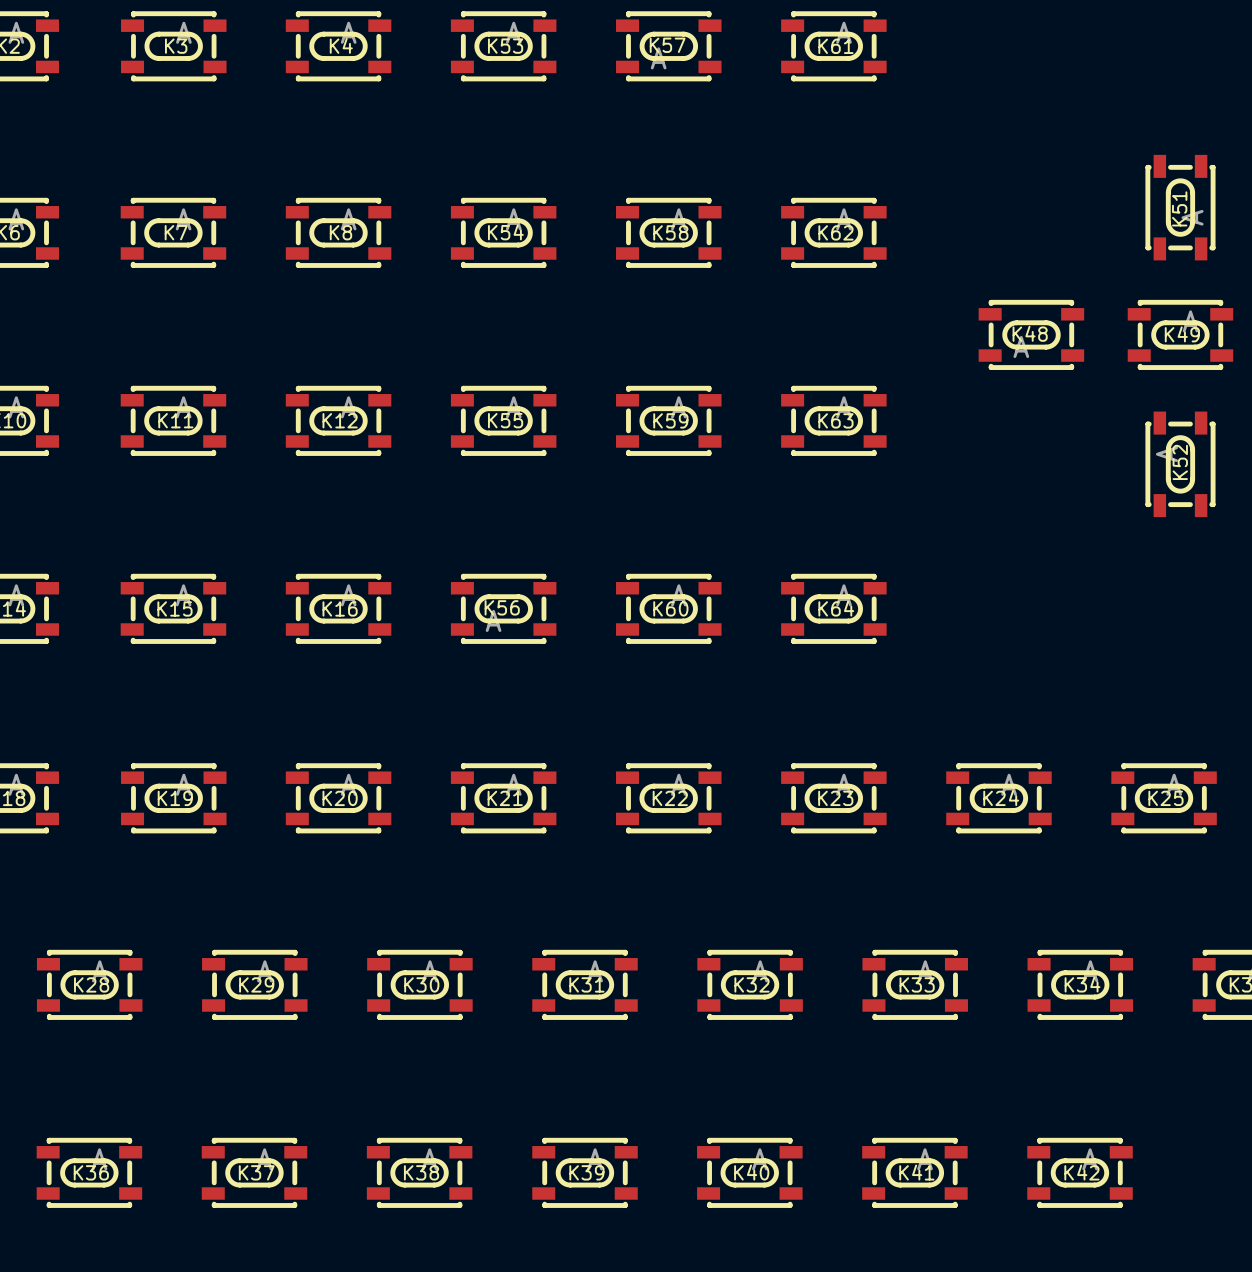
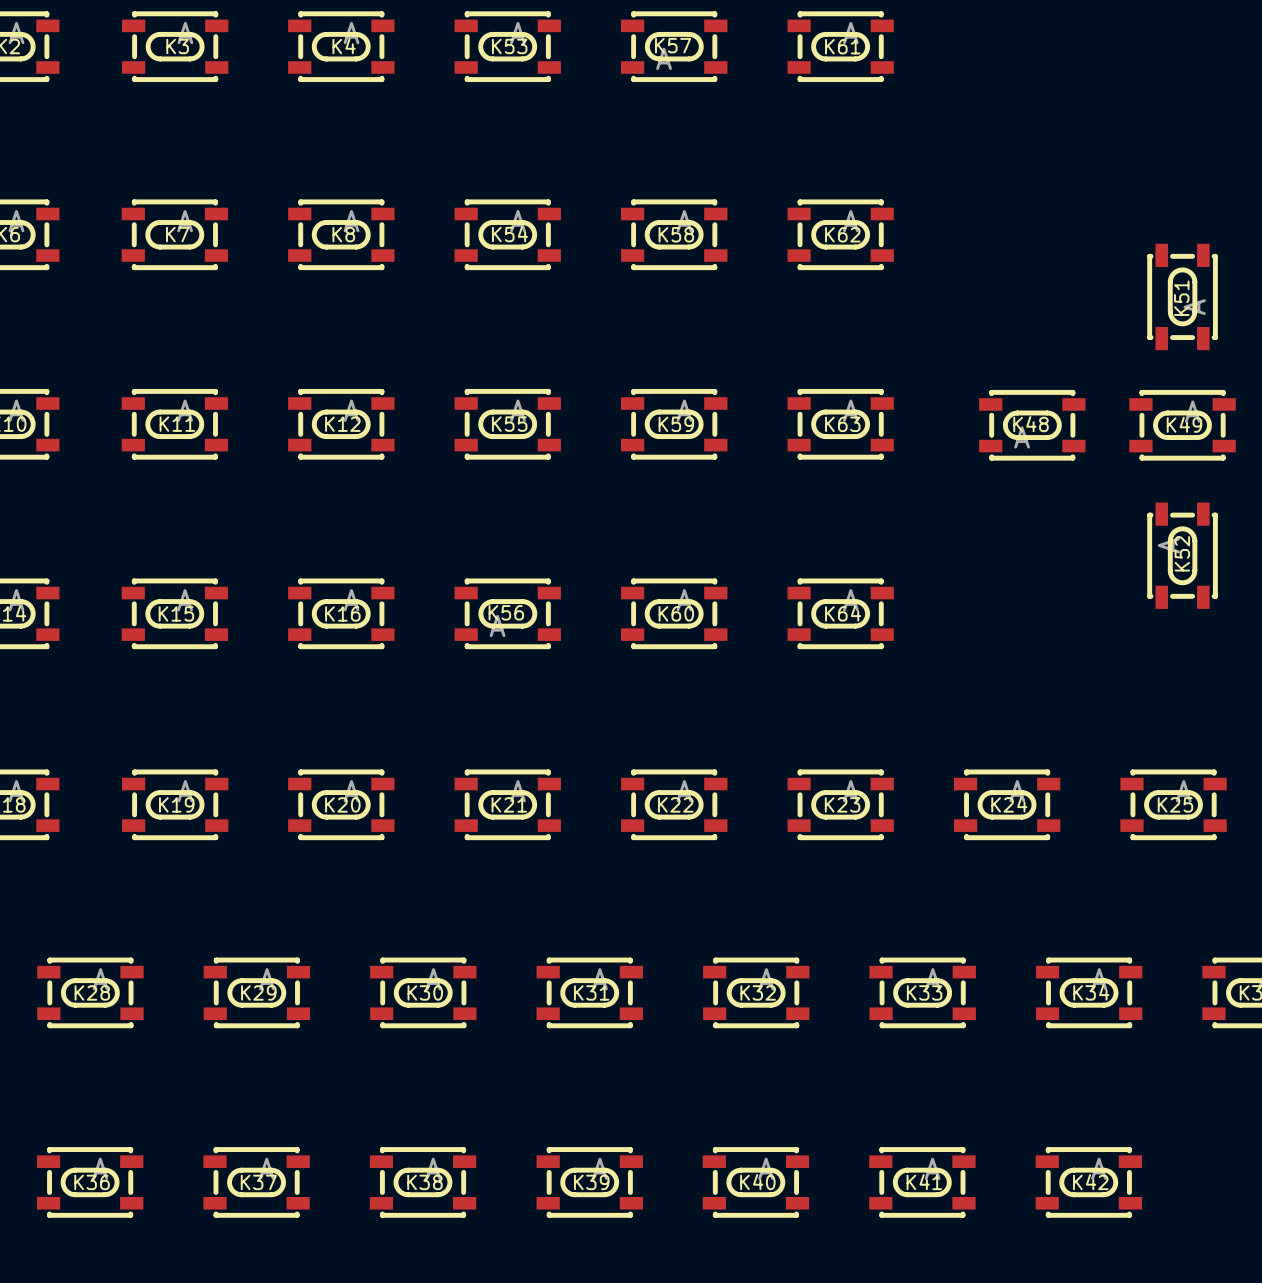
K51 position: (1180, 207) -> (1182, 296)
K48 position: (1031, 334) -> (1032, 425)
K49 position: (1180, 334) -> (1182, 425)
K52 position: (1180, 464) -> (1182, 555)

